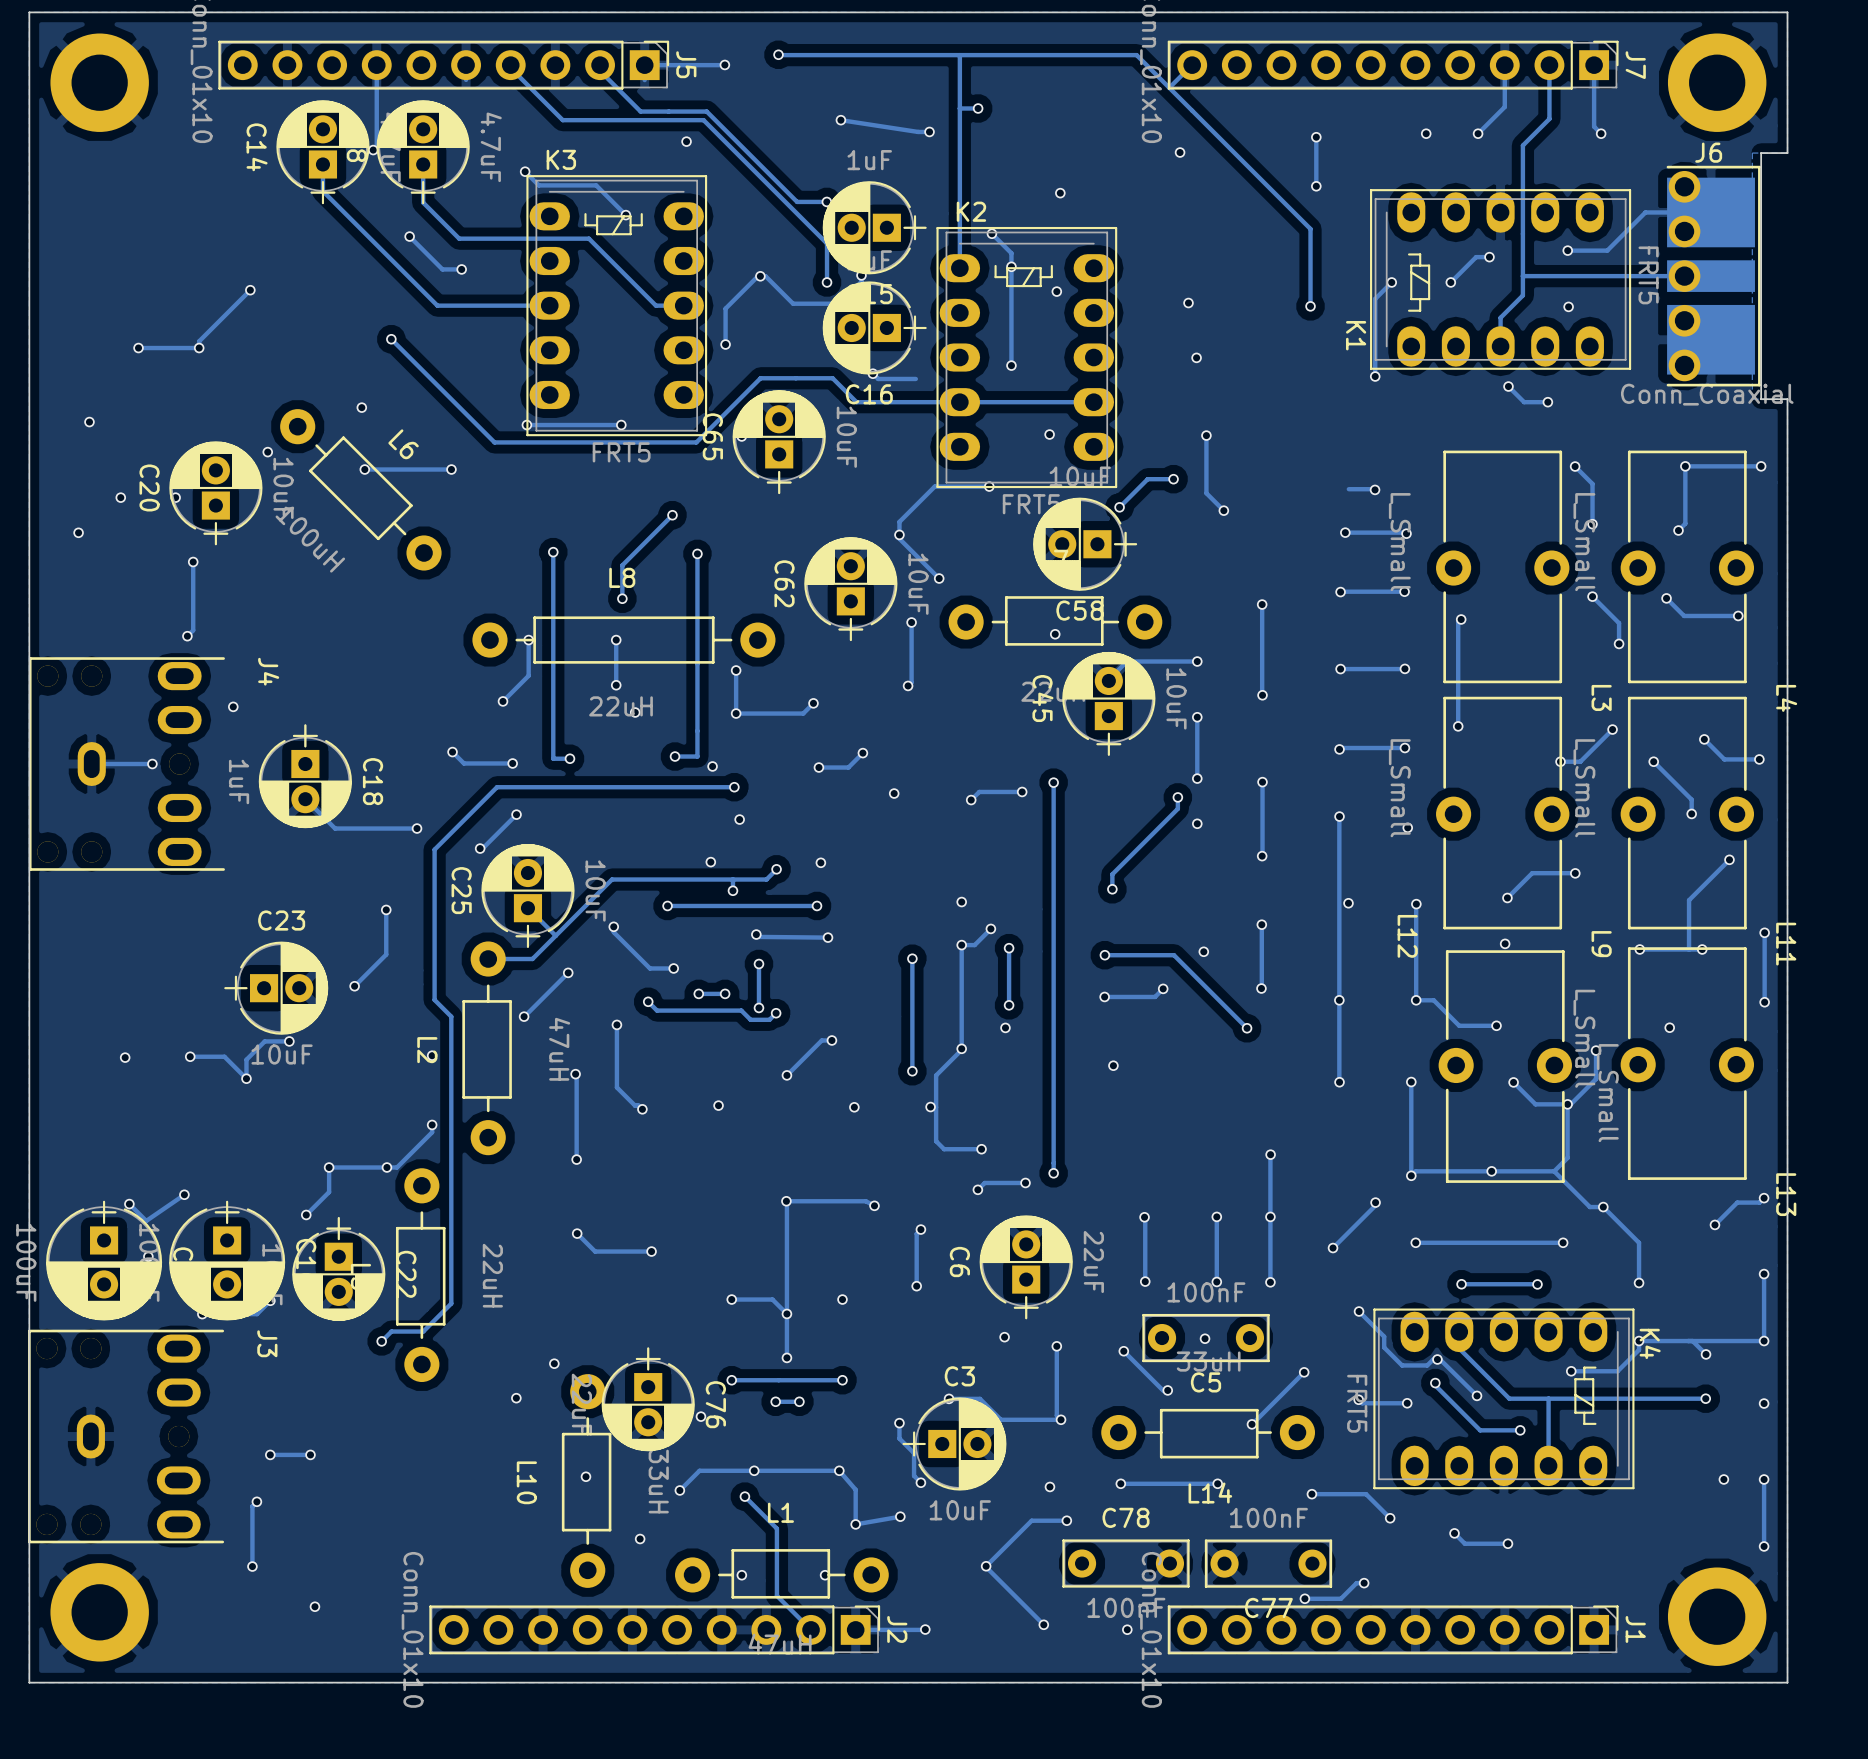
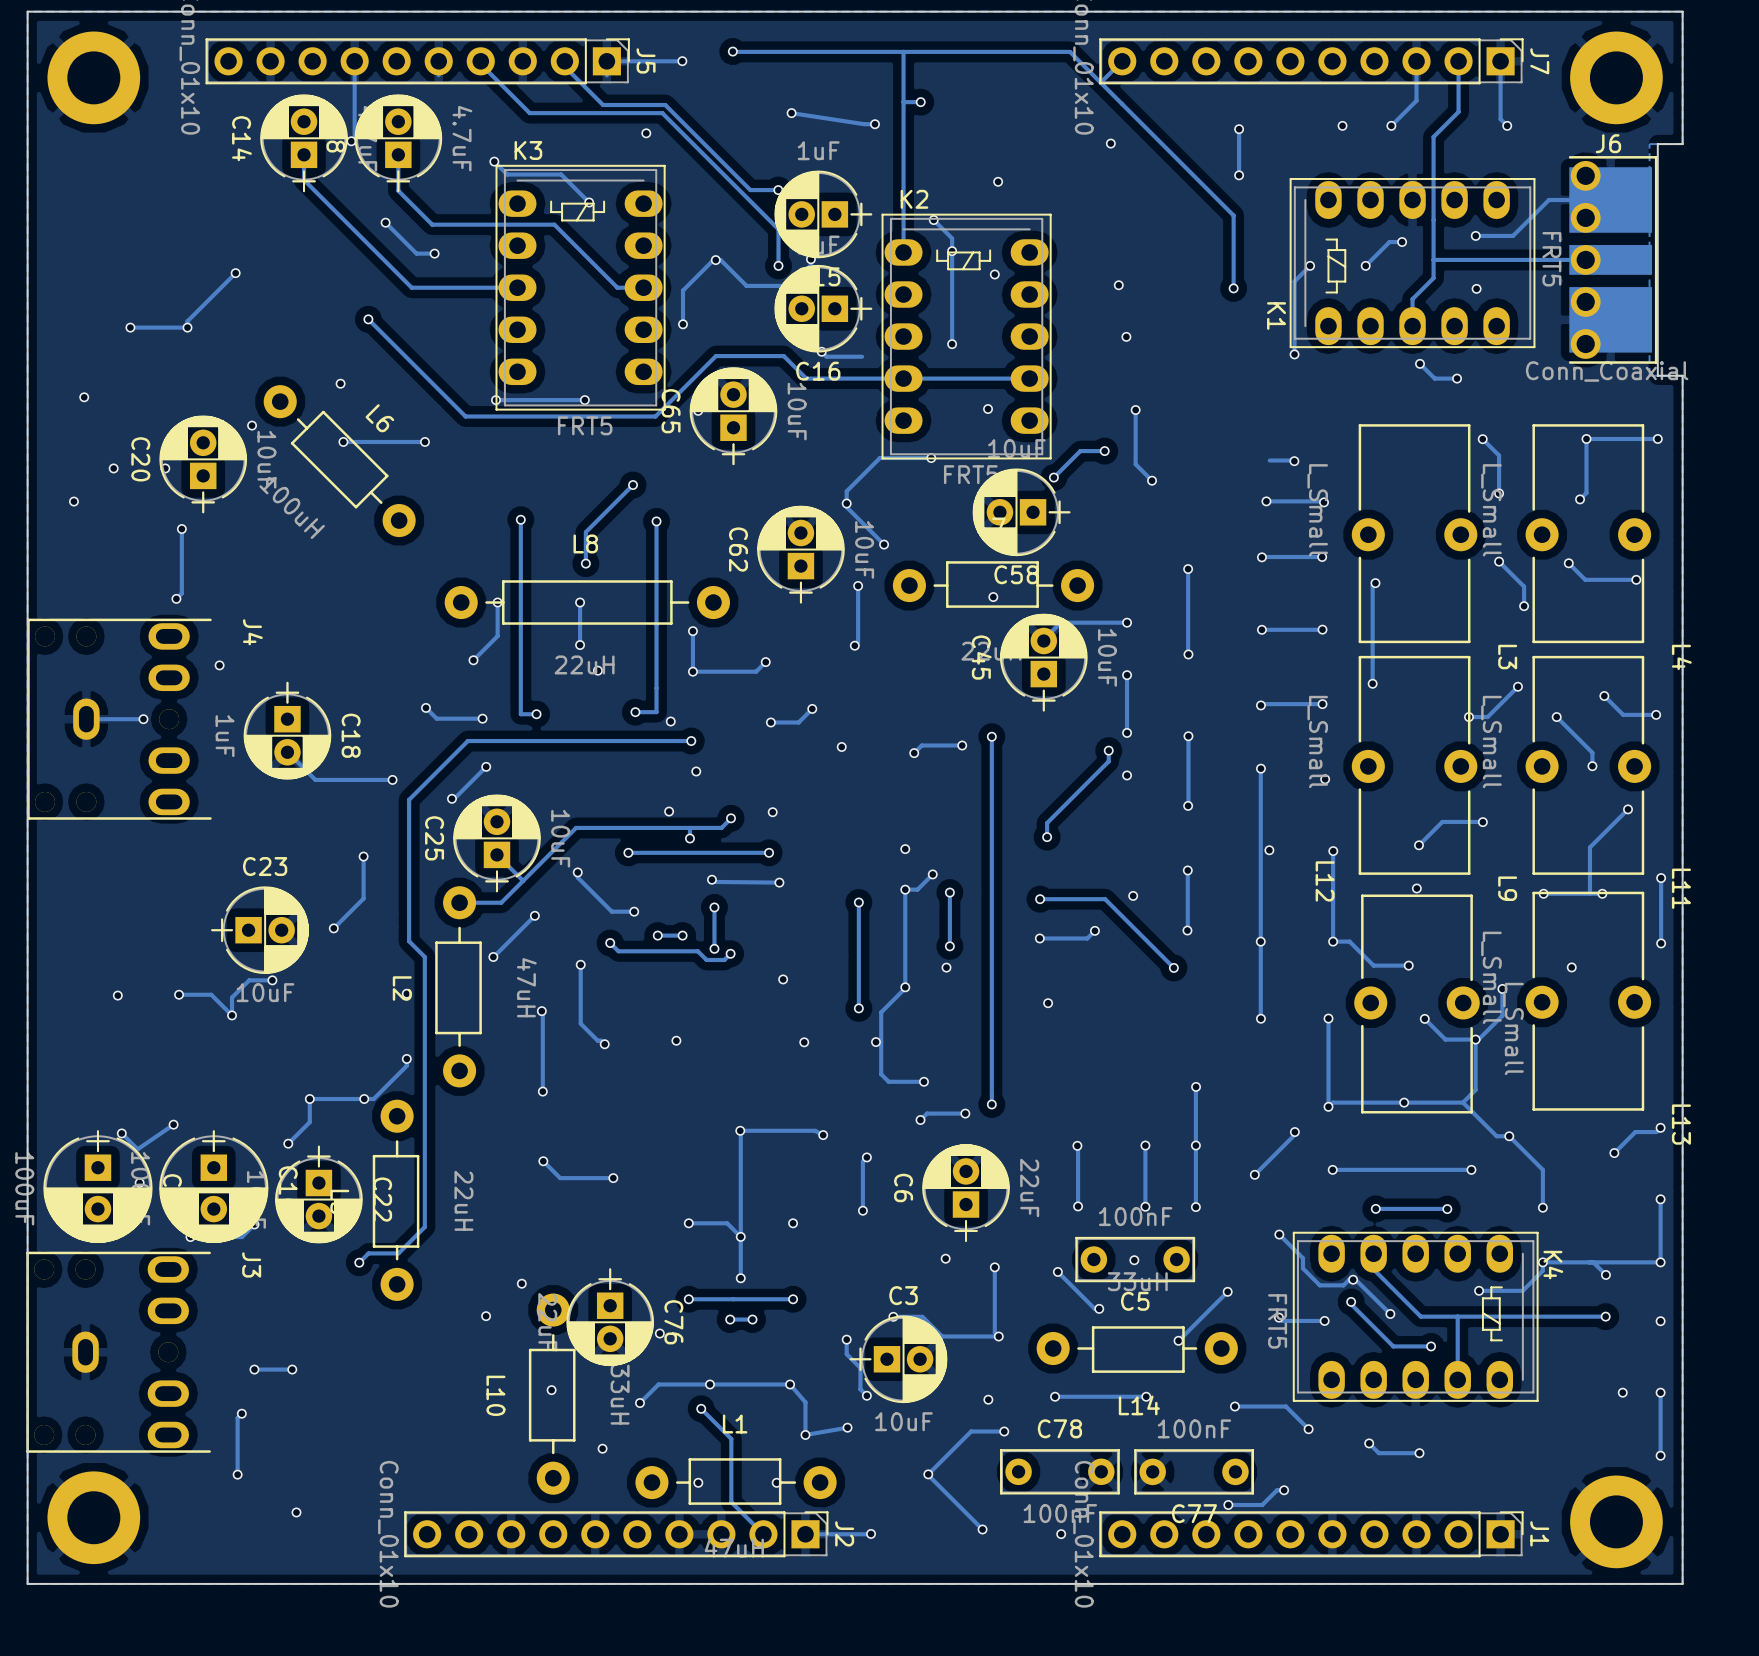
track: (831, 1040) (821, 1040) (786, 1075) -> none
via: (786, 1075) -> none

